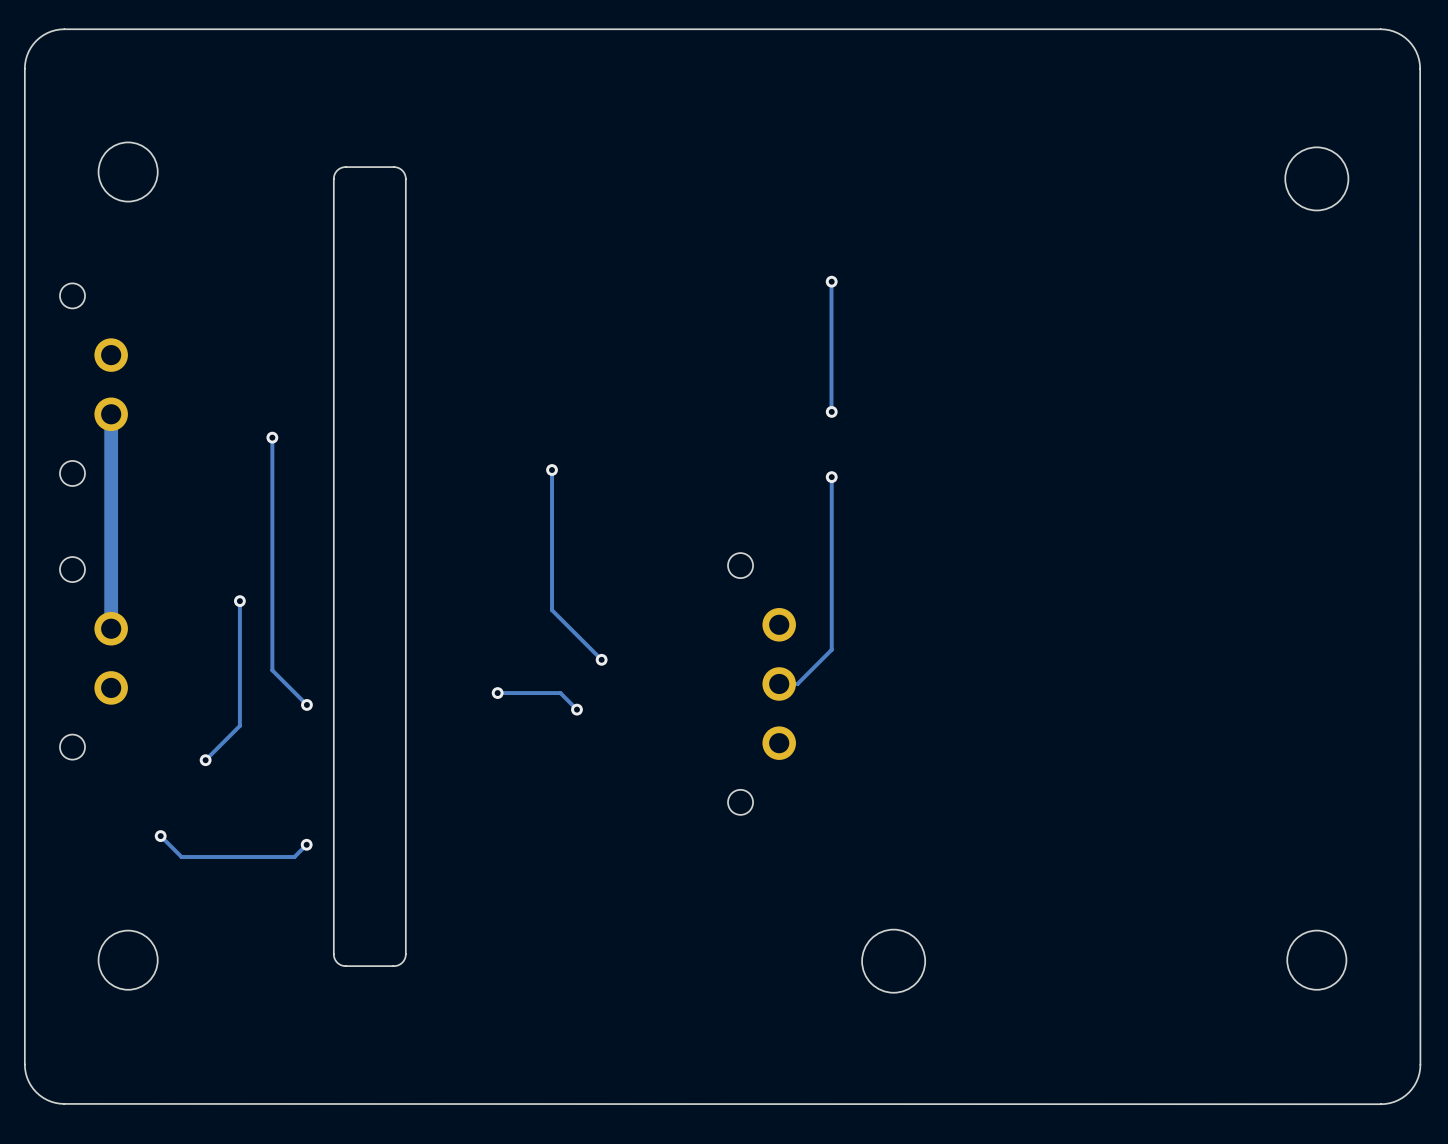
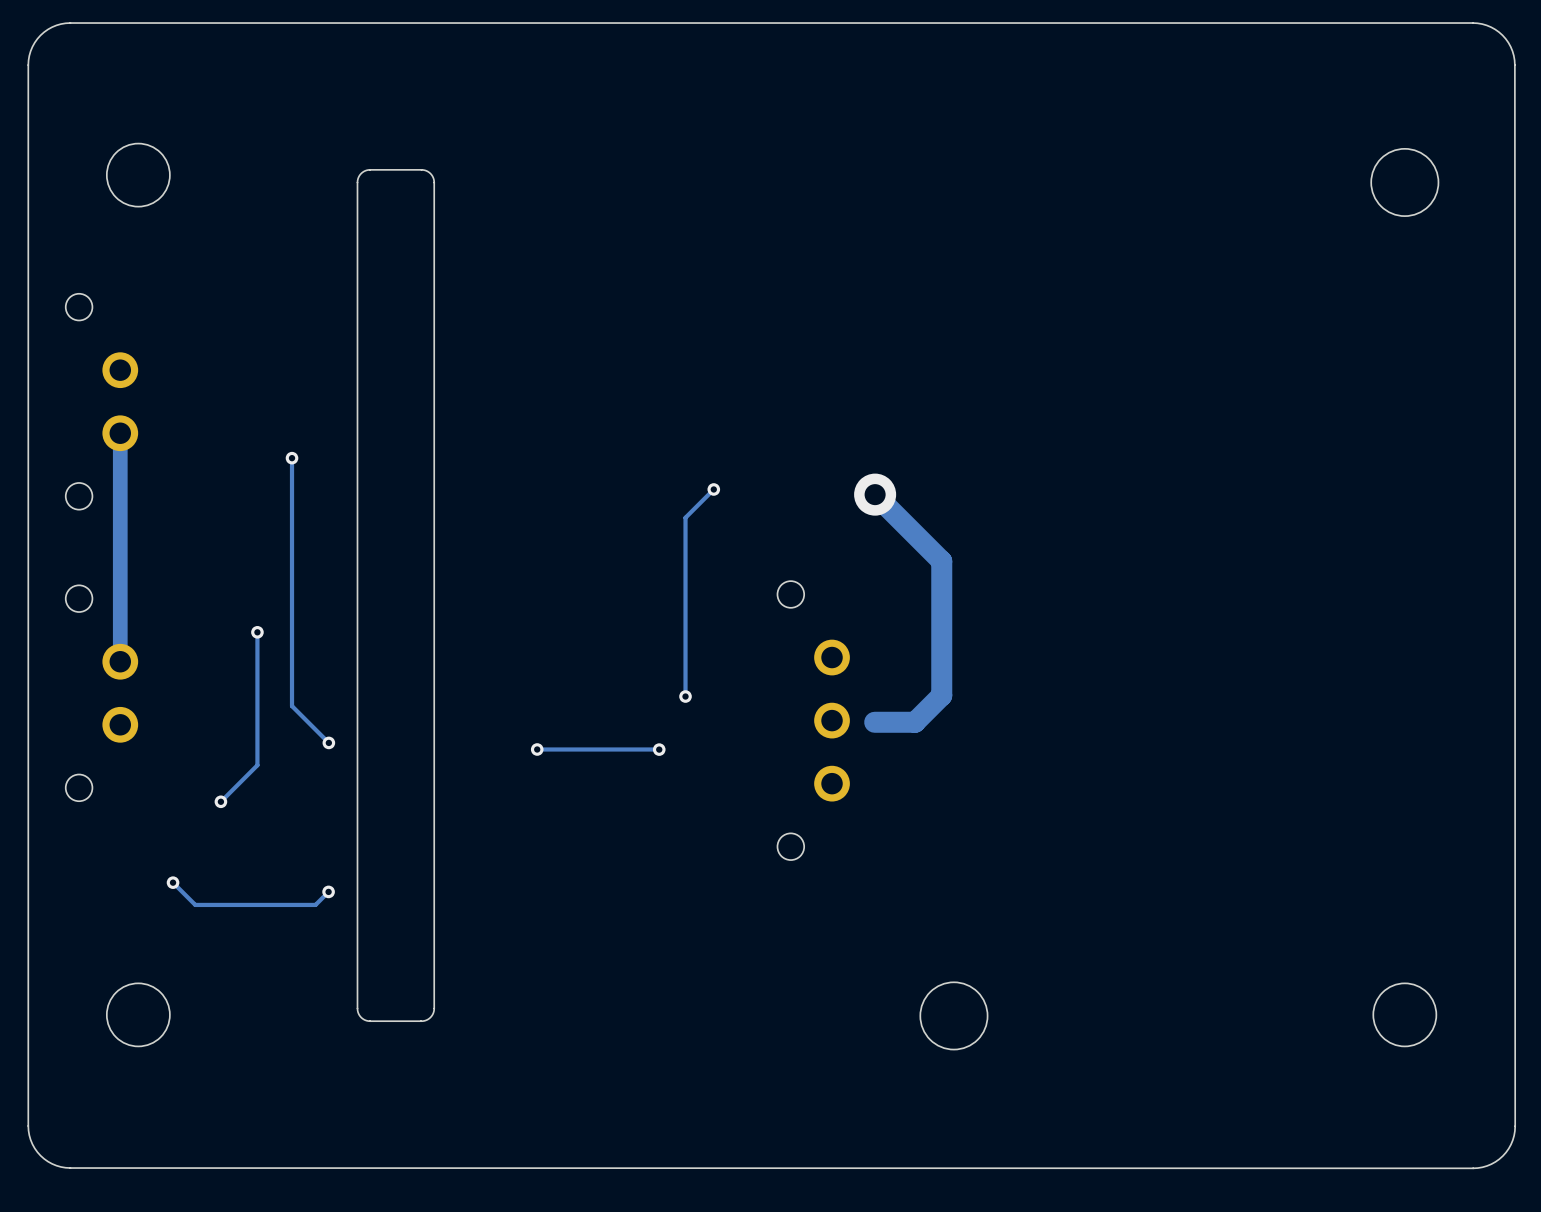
track: (831, 281) (831, 411) -> none
via: (831, 281) -> none
via: (831, 411) -> none
track: none -> (713, 489) (685, 517) (685, 696)
via: none -> (713, 489)
track: (552, 470) (552, 610) (601, 659) -> none
via: (552, 470) -> none
track: none -> (875, 494) (941, 561) (941, 695) (915, 722) (874, 722)
via size: [825, 471, 838, 484] -> [854, 473, 897, 516]
track: (831, 477) (831, 649) (797, 683) (779, 683) -> none
via: (601, 659) -> none
via: none -> (685, 696)
track: (497, 693) (560, 693) (576, 709) -> none
via position: (497, 693) -> (537, 749)
via: (576, 709) -> none
track: none -> (659, 749) (537, 749)
via: none -> (659, 749)

